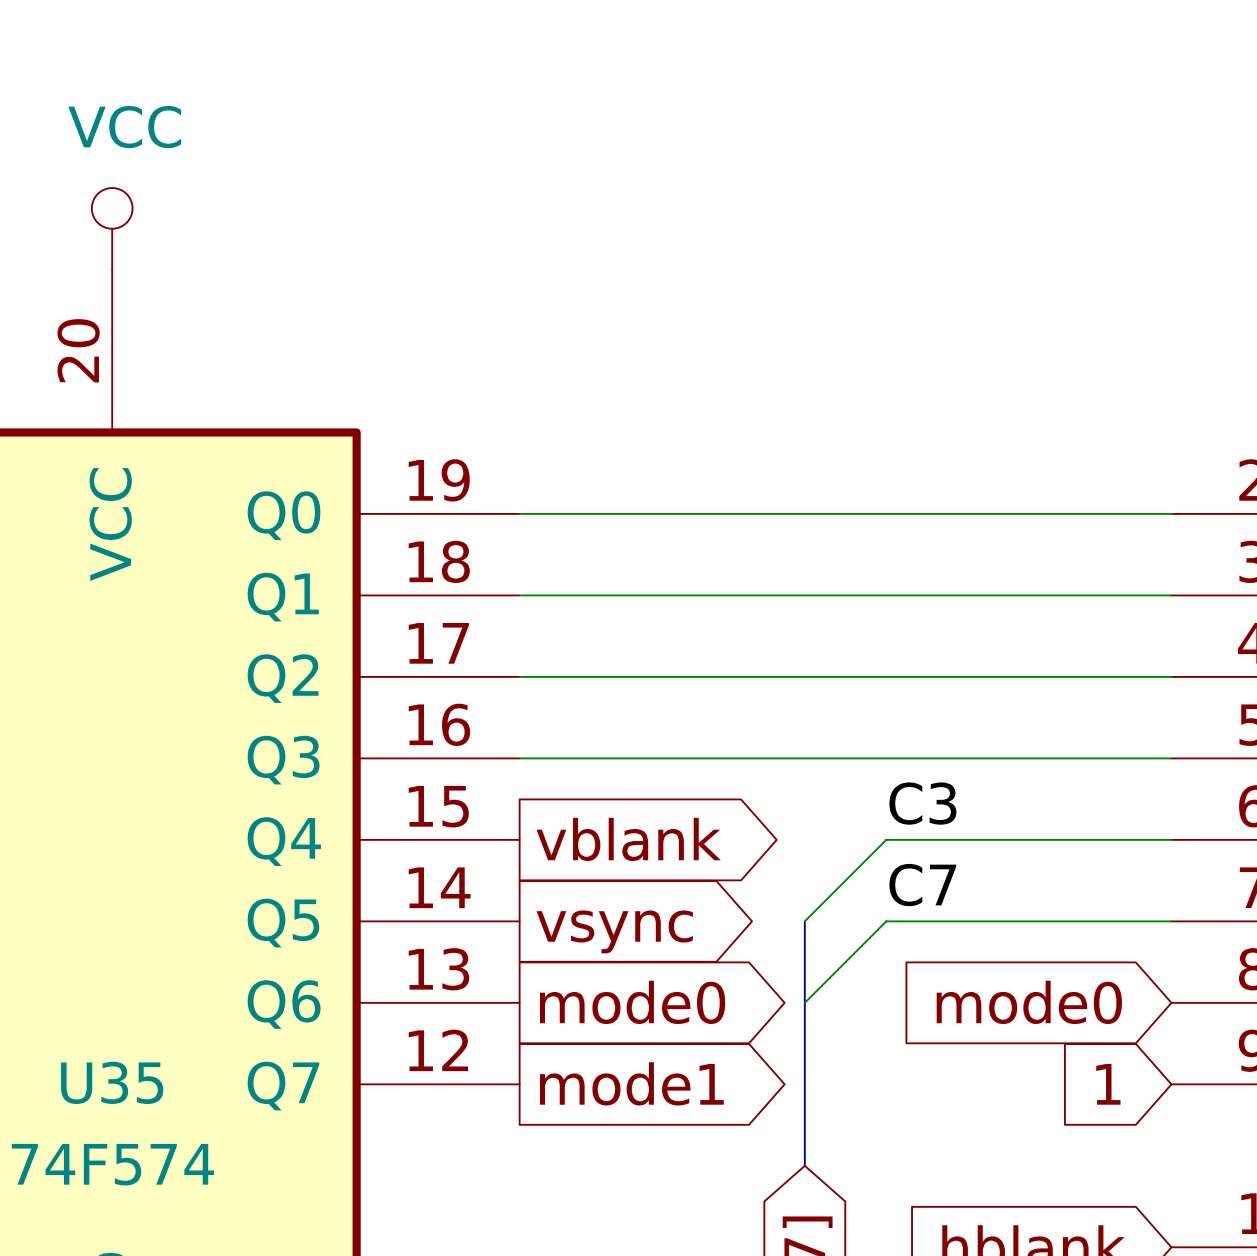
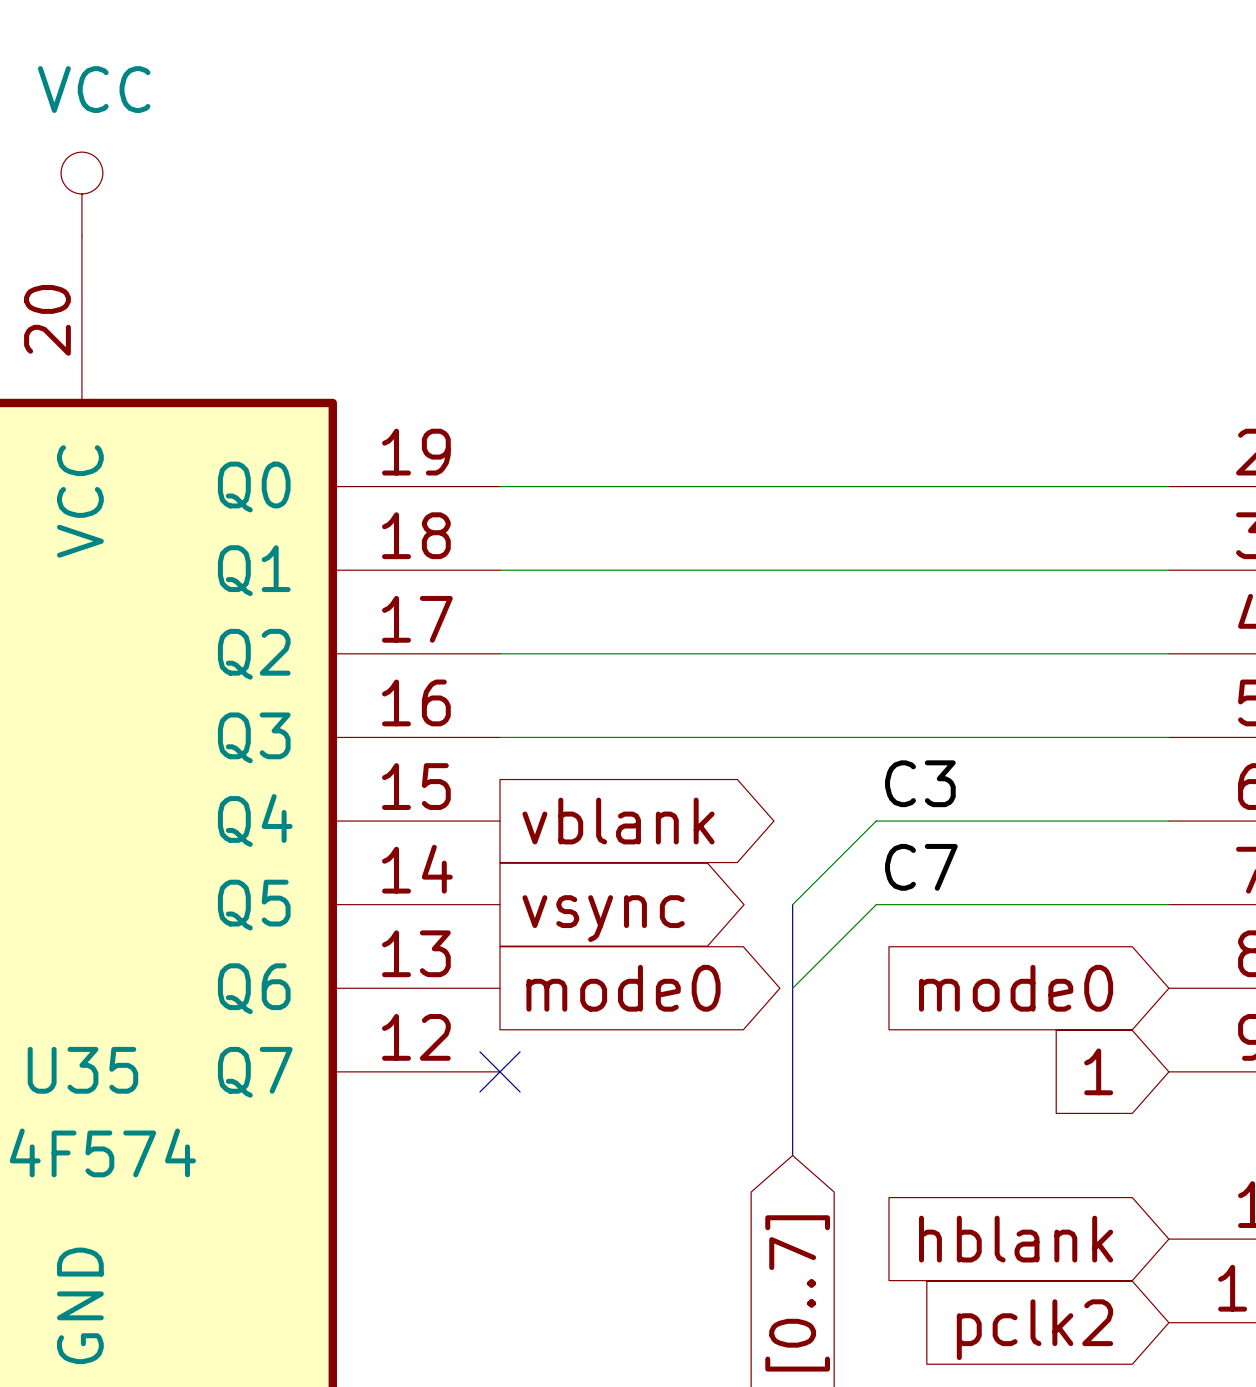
global label: mode1 (631, 1083) -> none
no-connect mark: none -> (500, 1071)

